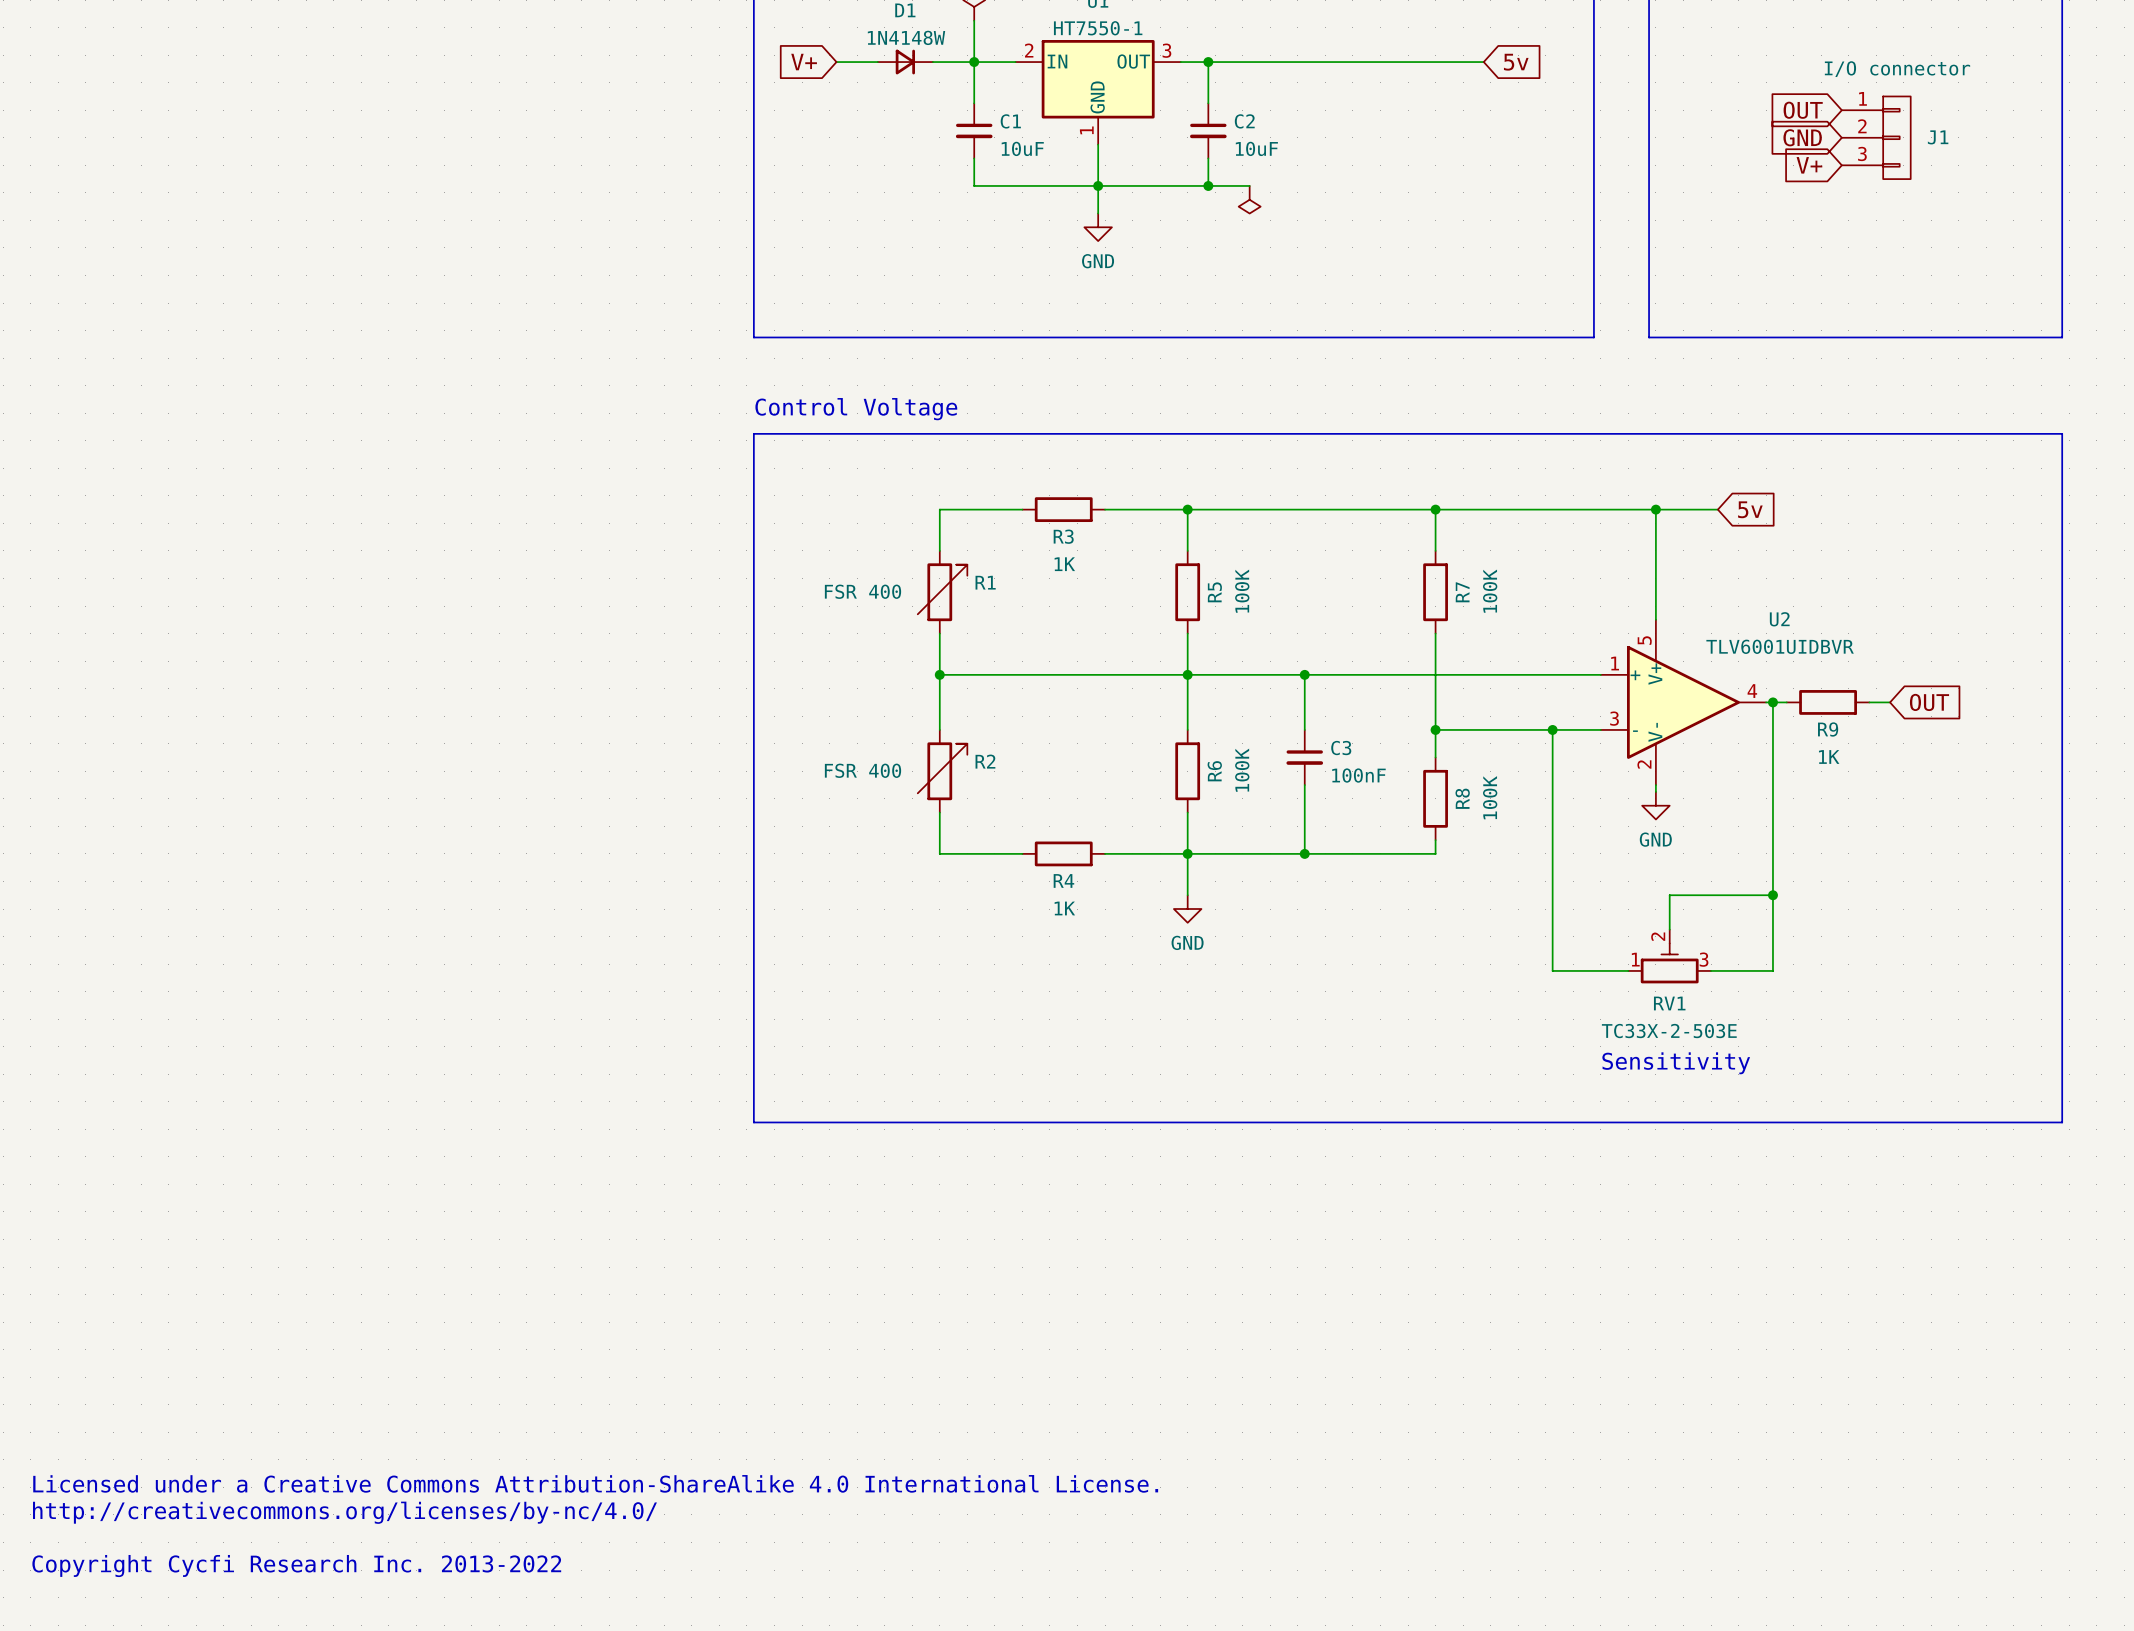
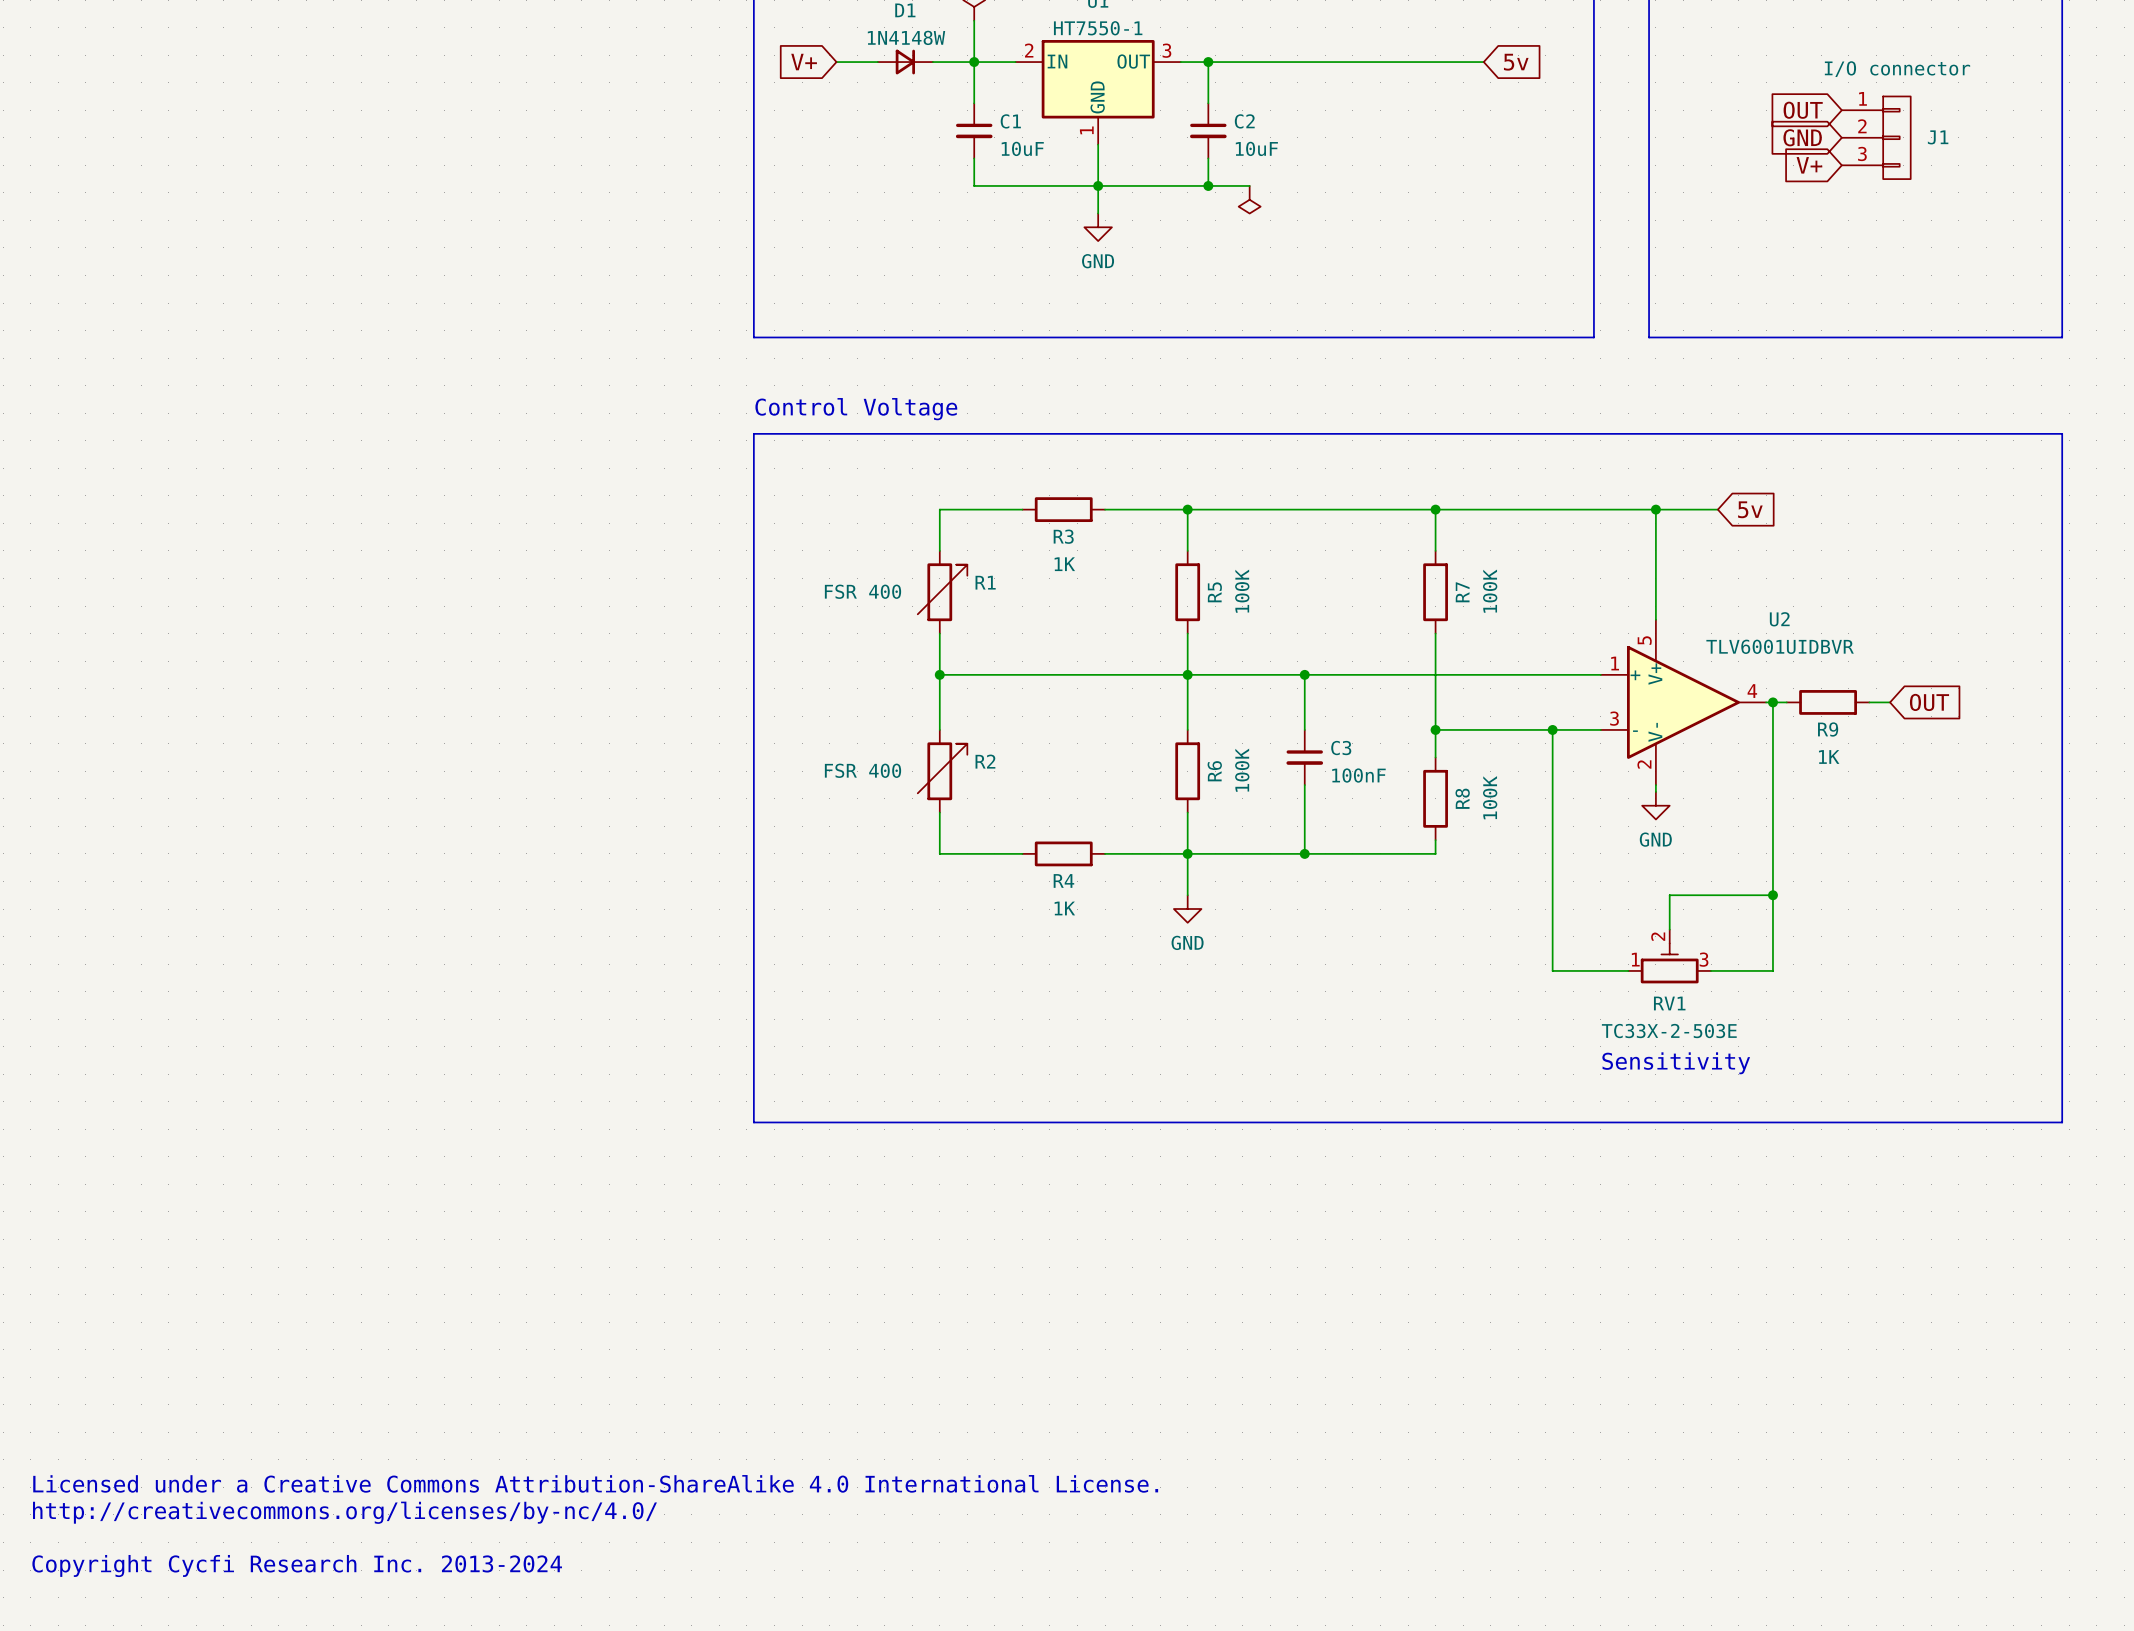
text: Copyright Cycfi Research Inc. 2013-2022 (296, 1566) -> Copyright Cycfi Research Inc. 2013-2024 (297, 1566)

